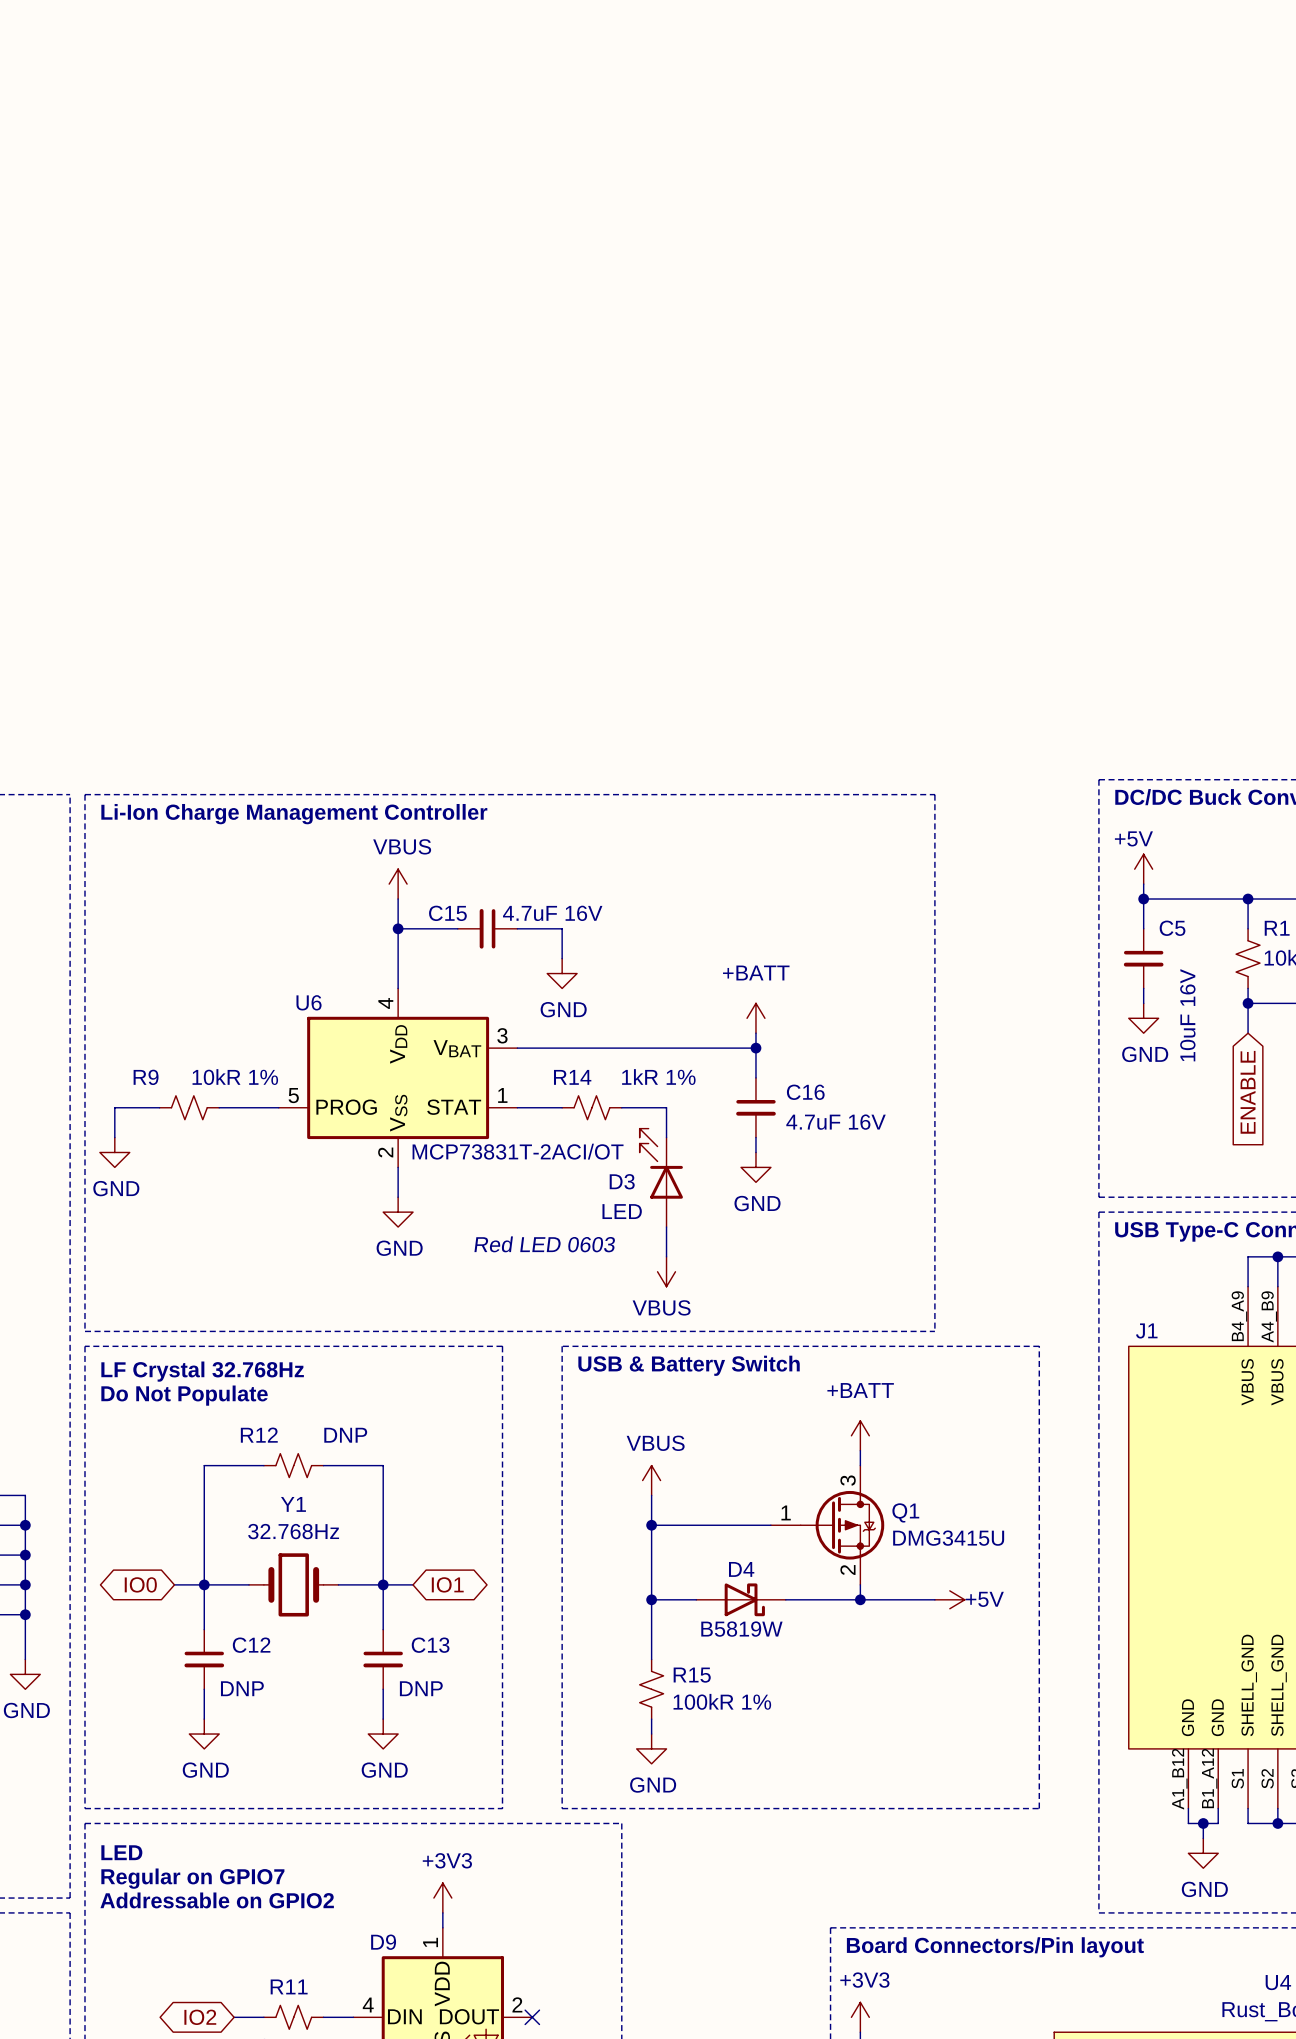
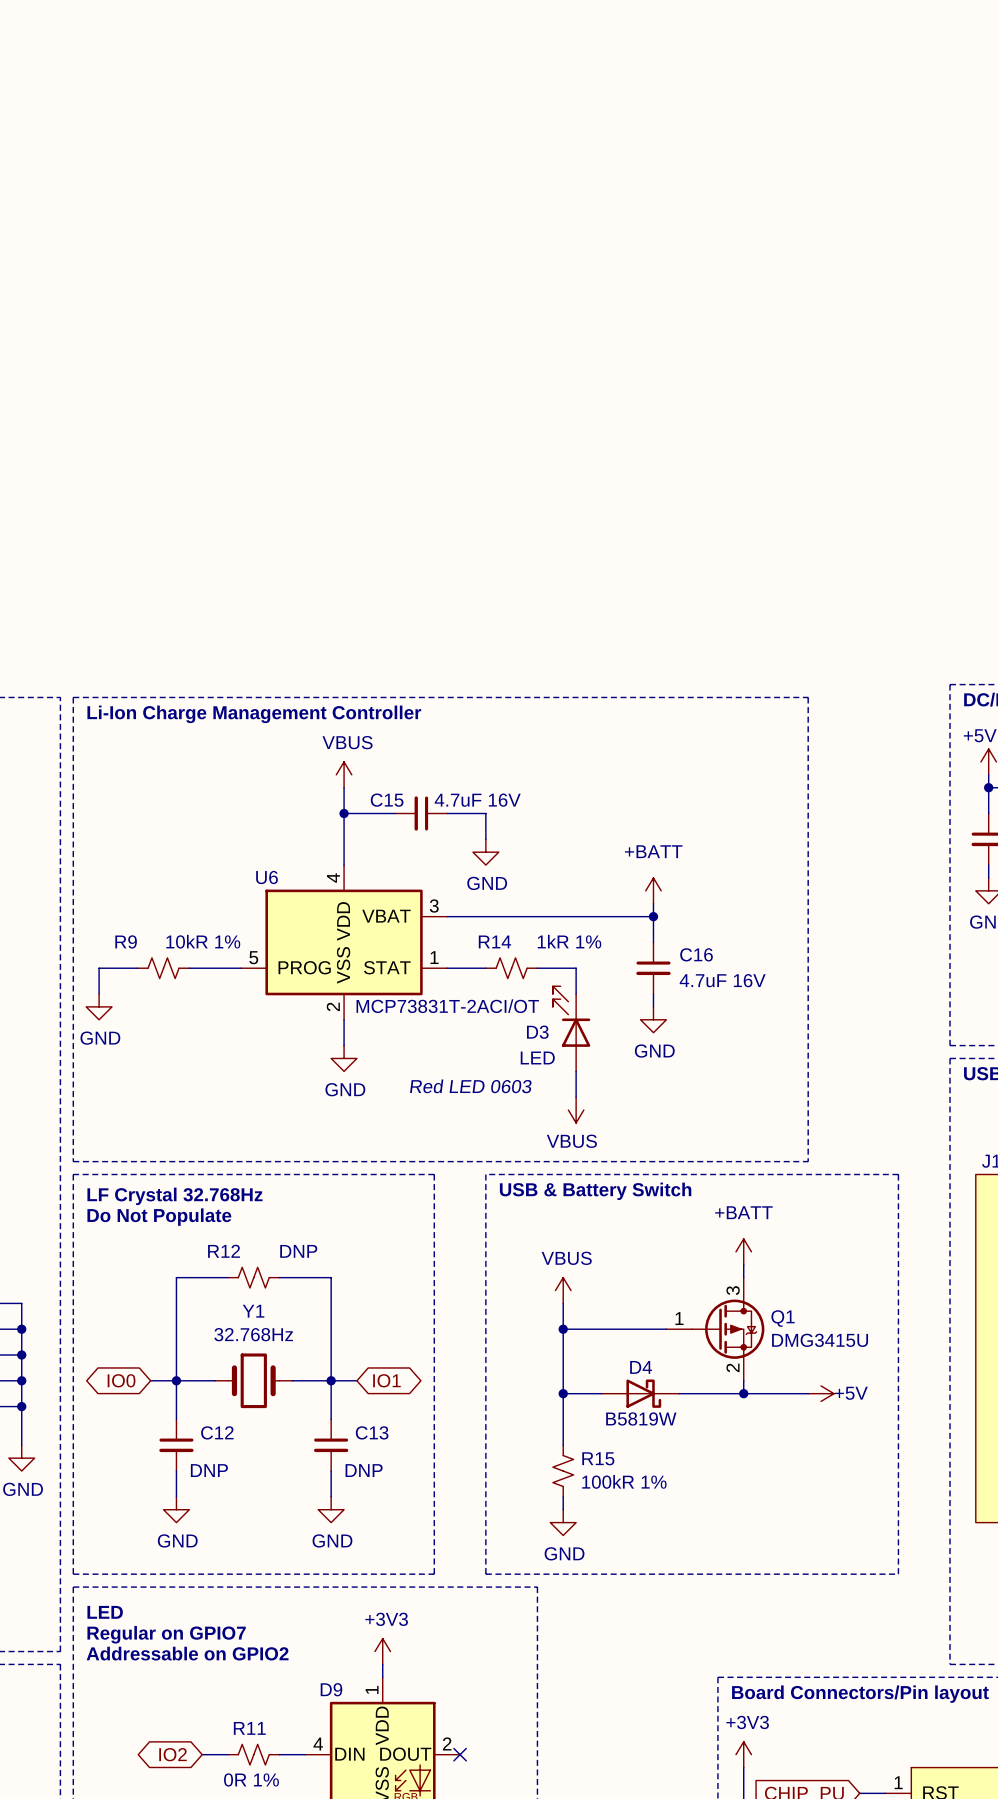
U6 symbol: [278, 988, 518, 1168] -> [240, 865, 448, 1020]

